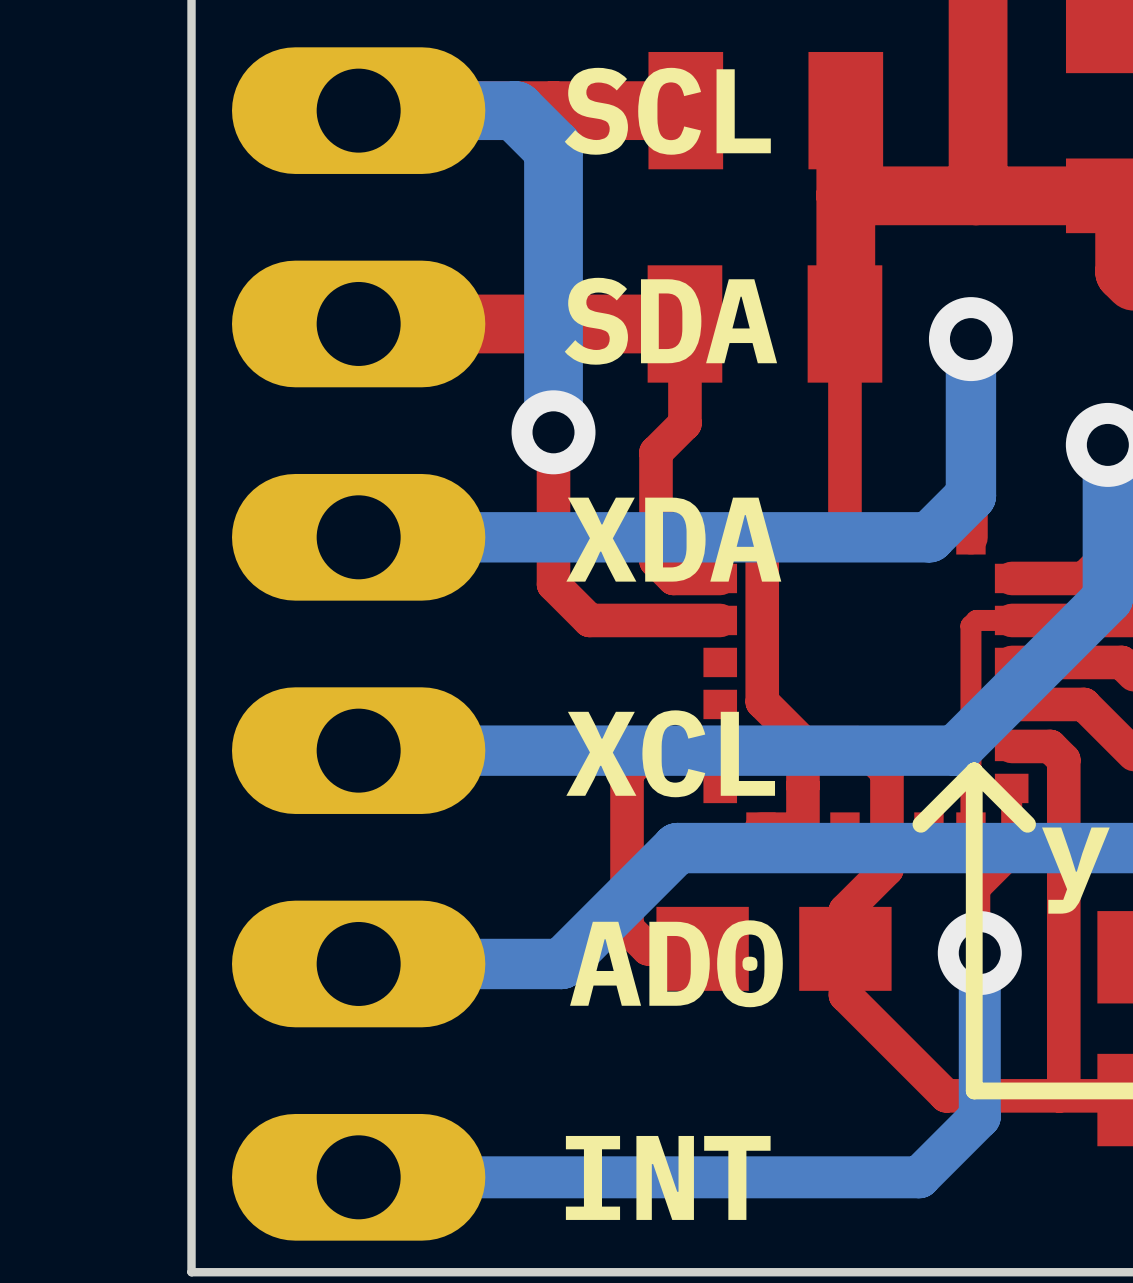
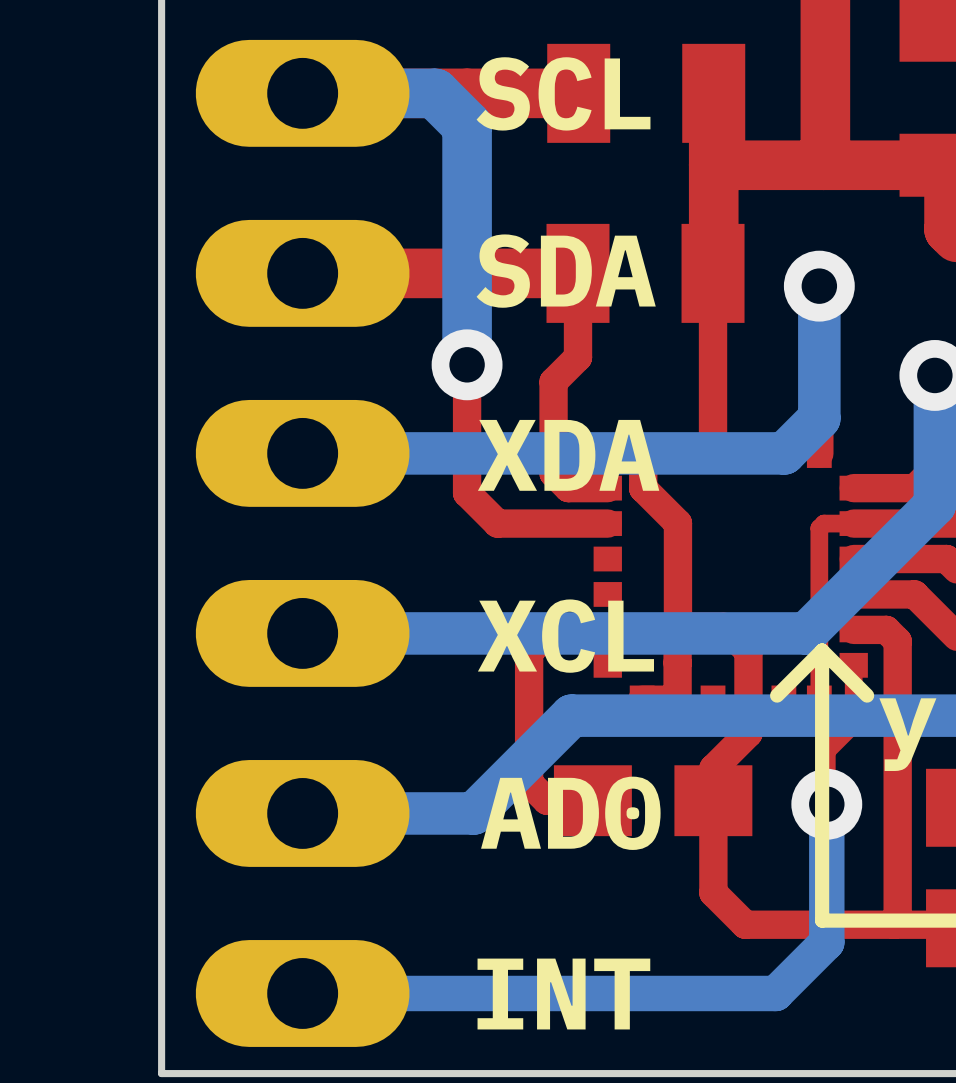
top track: (762, 578) (762, 701) (802, 742) -> (643, 488) (677, 523) (677, 626)
top track: (845, 995) (946, 1095) -> (713, 839) (713, 892) (745, 924) (798, 924)

